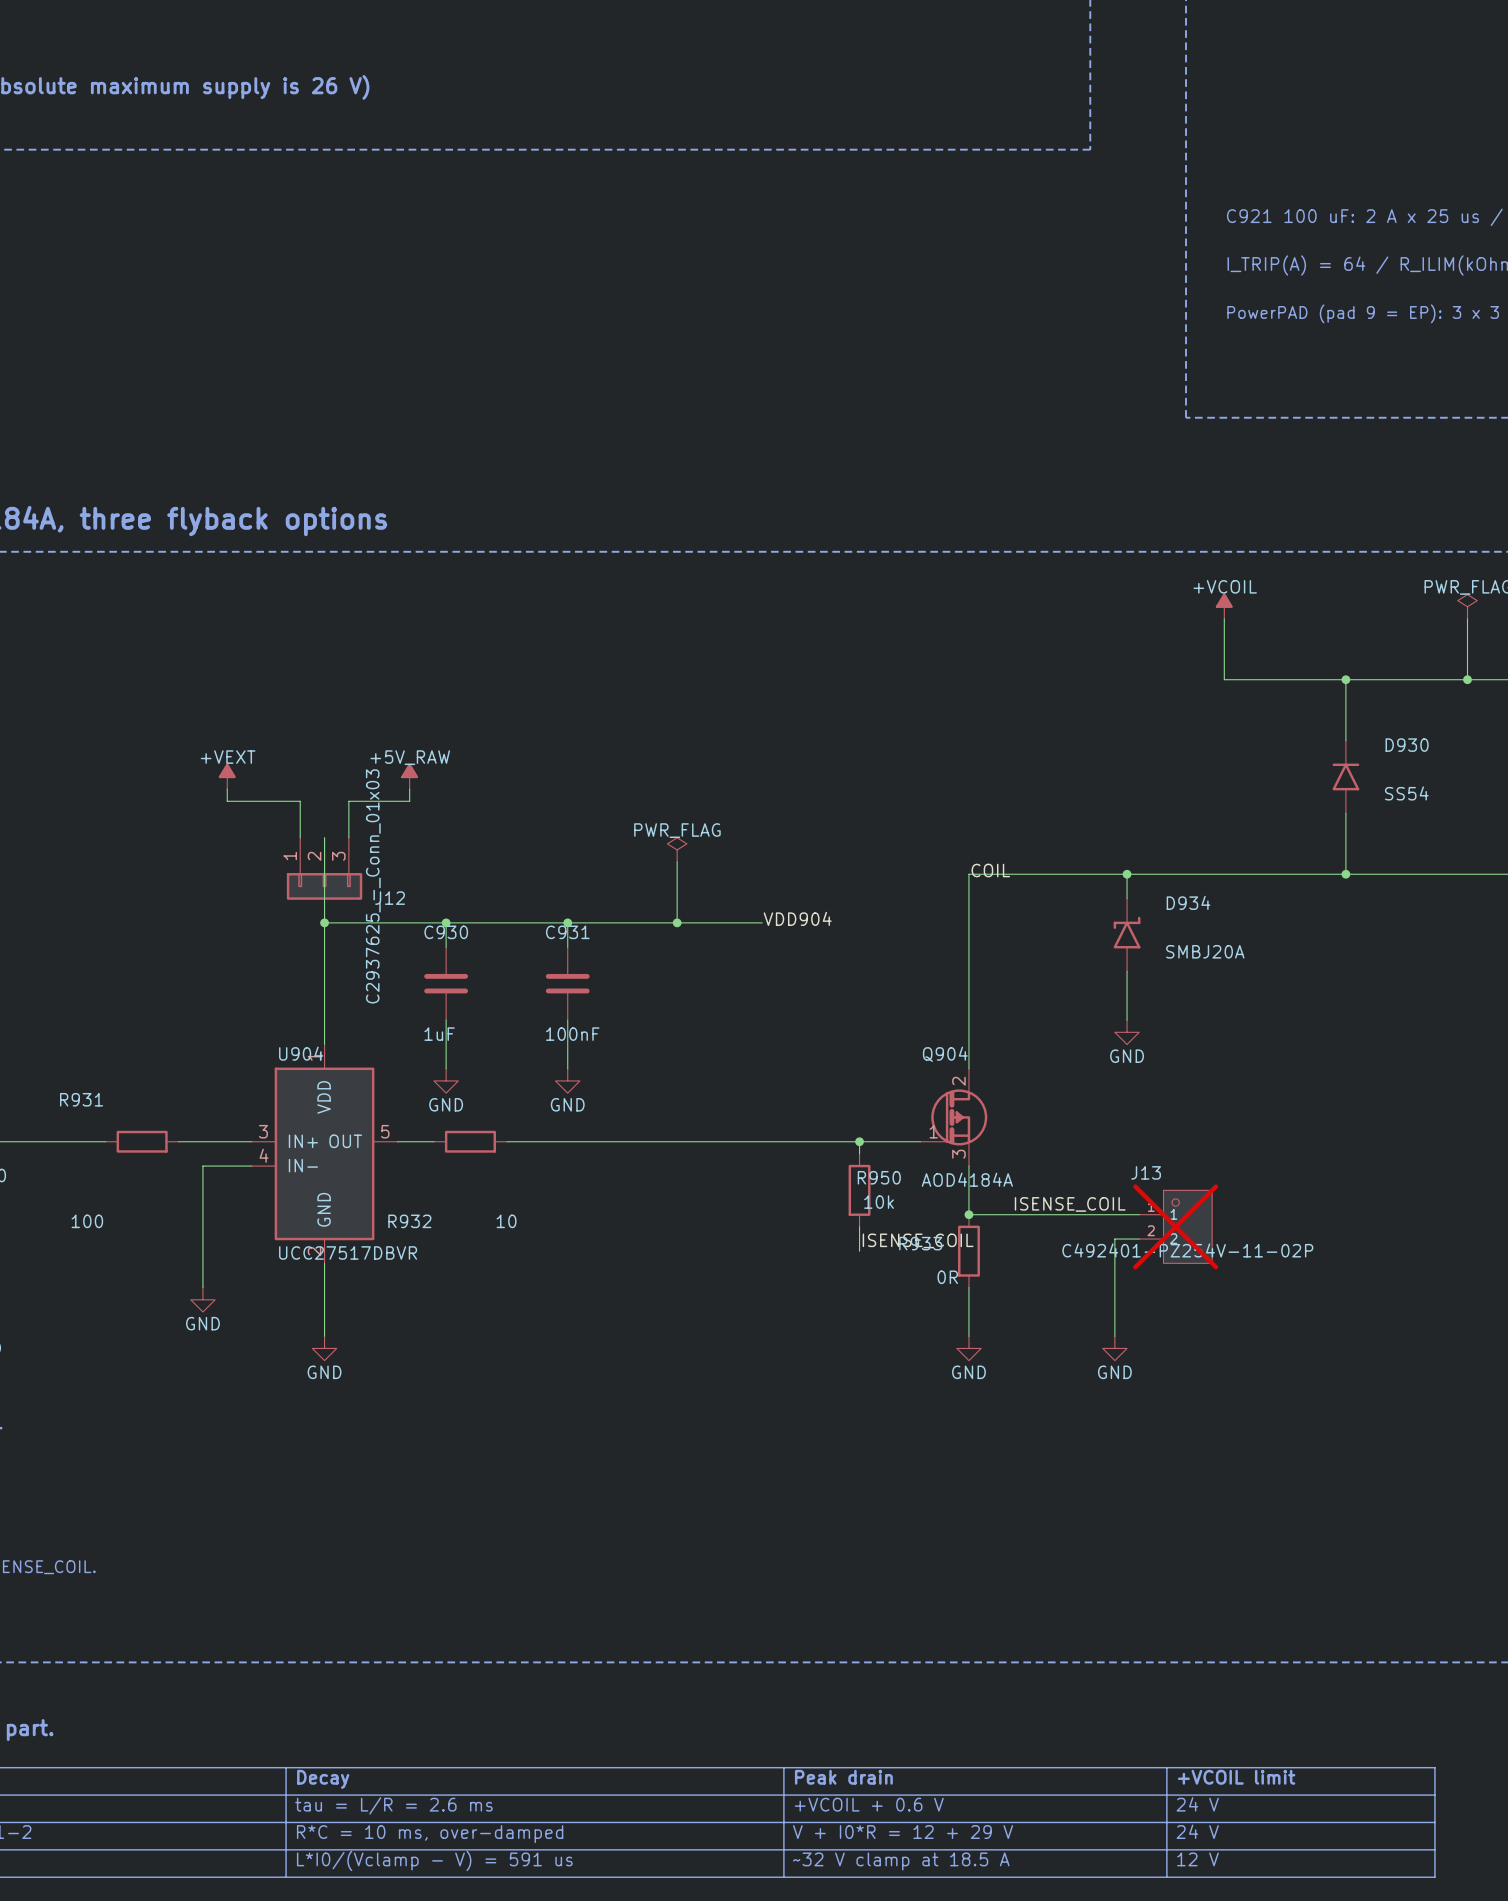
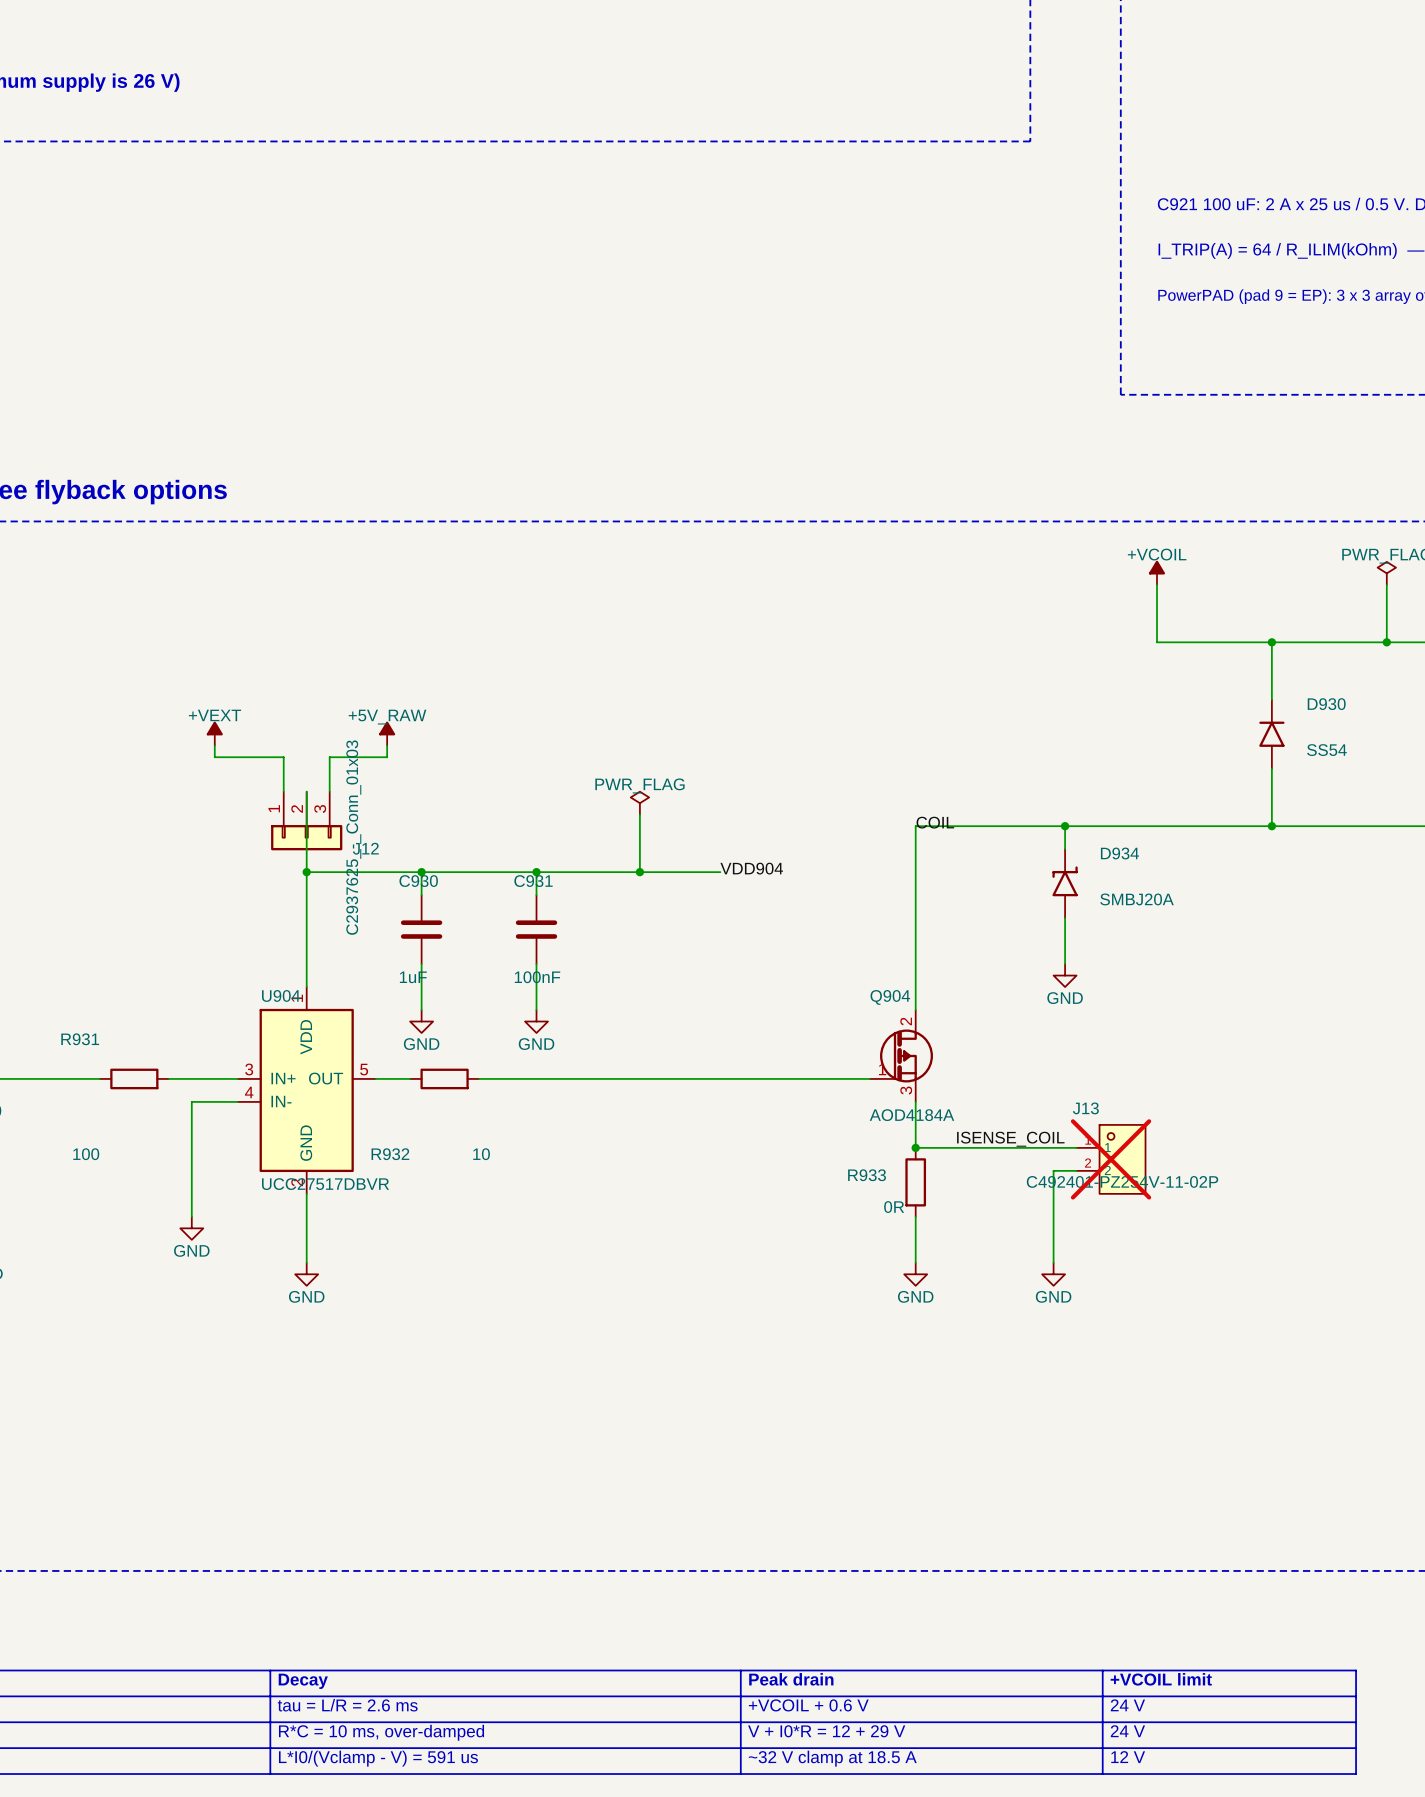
wire: (859, 1141) (859, 1153) -> none
junction: (859, 1141) -> none
R950: 10k (859, 1190) -> none
wire: (859, 1226) (859, 1251) -> none
label: ISENSE_COIL (918, 1240) -> none

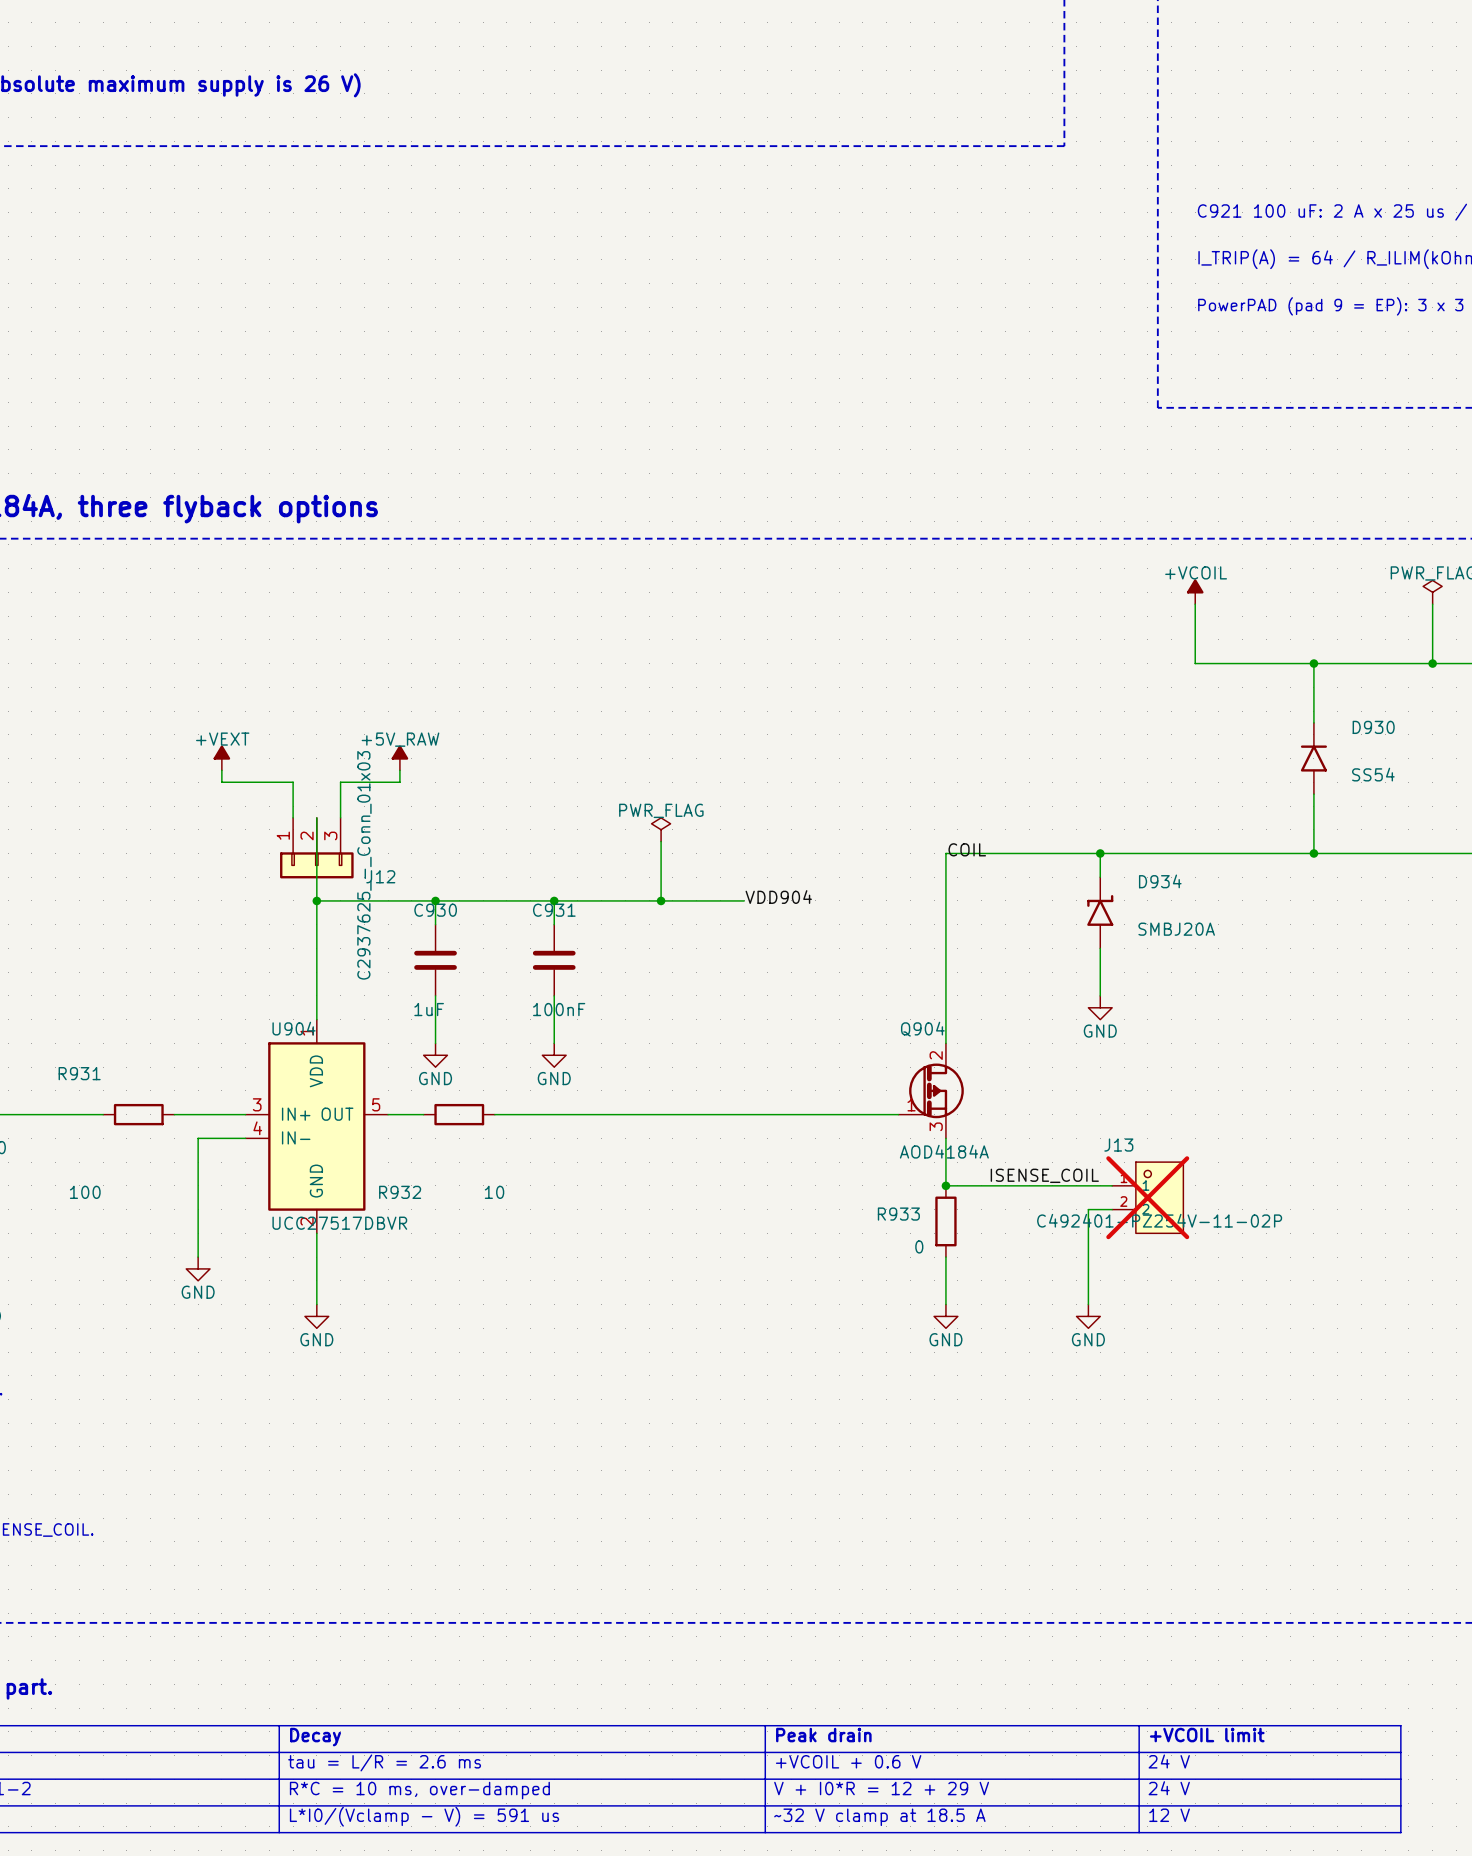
R933 value: 0R (894, 1207) -> 0 (919, 1246)

